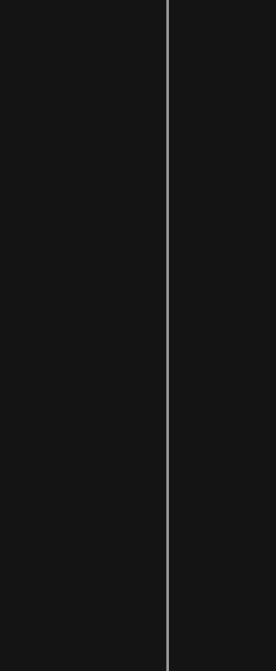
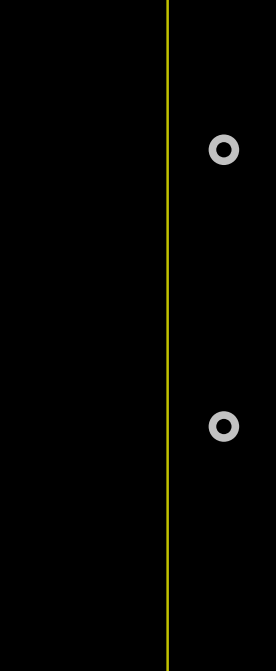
via: none -> (223, 149)
via: none -> (223, 426)

